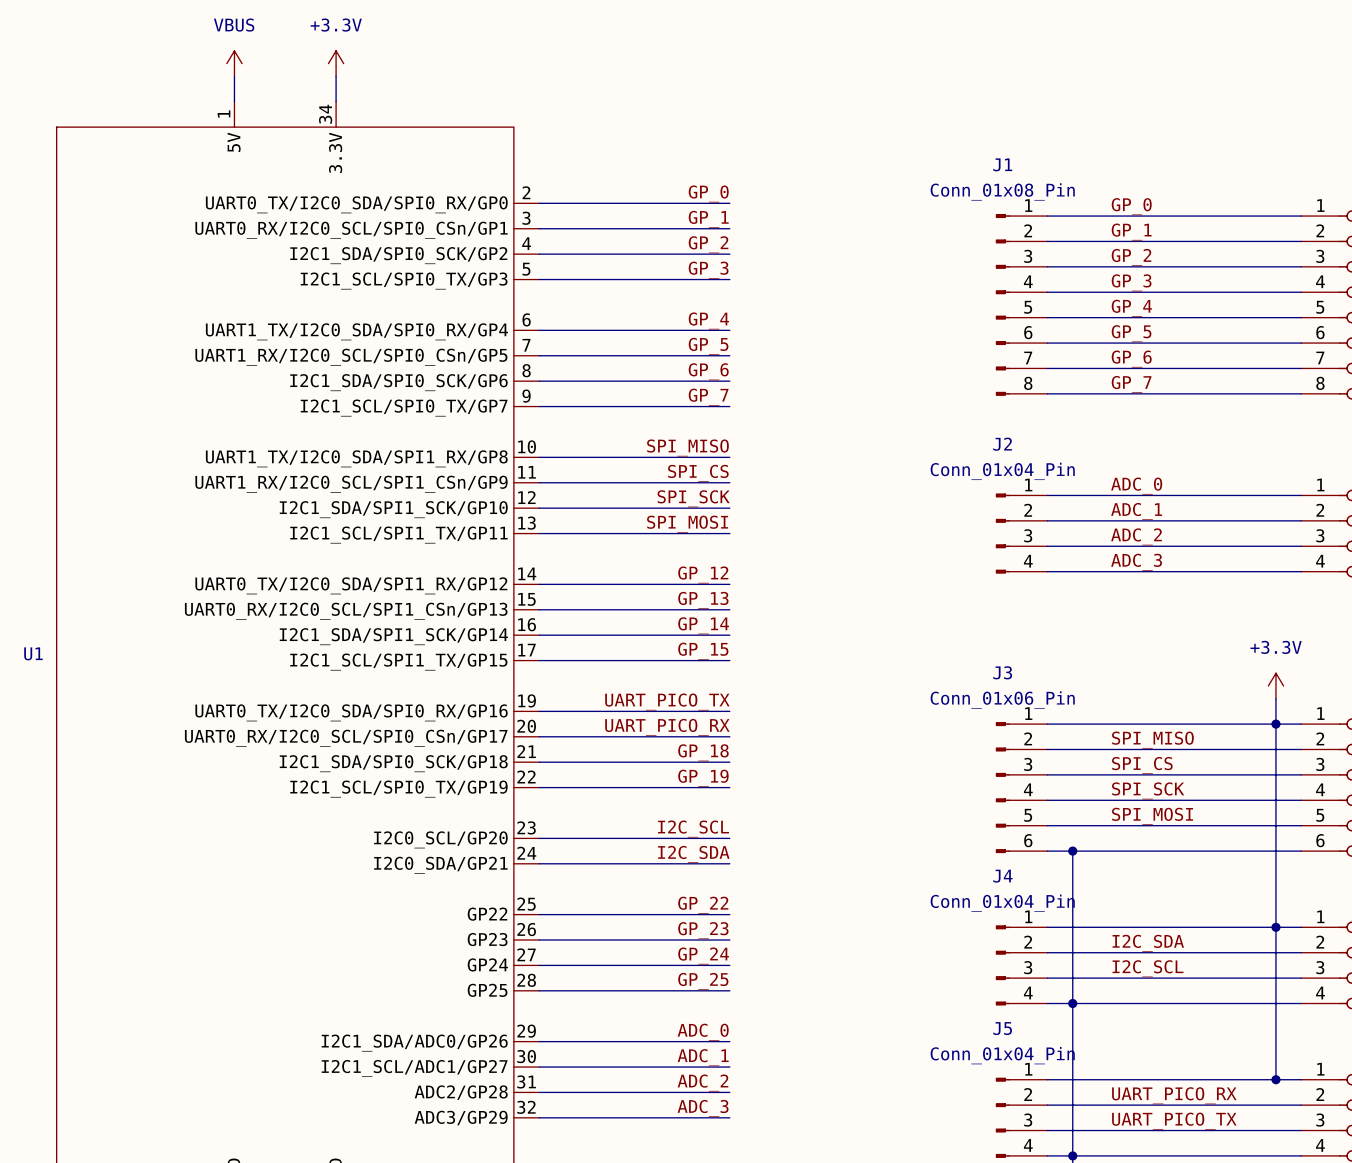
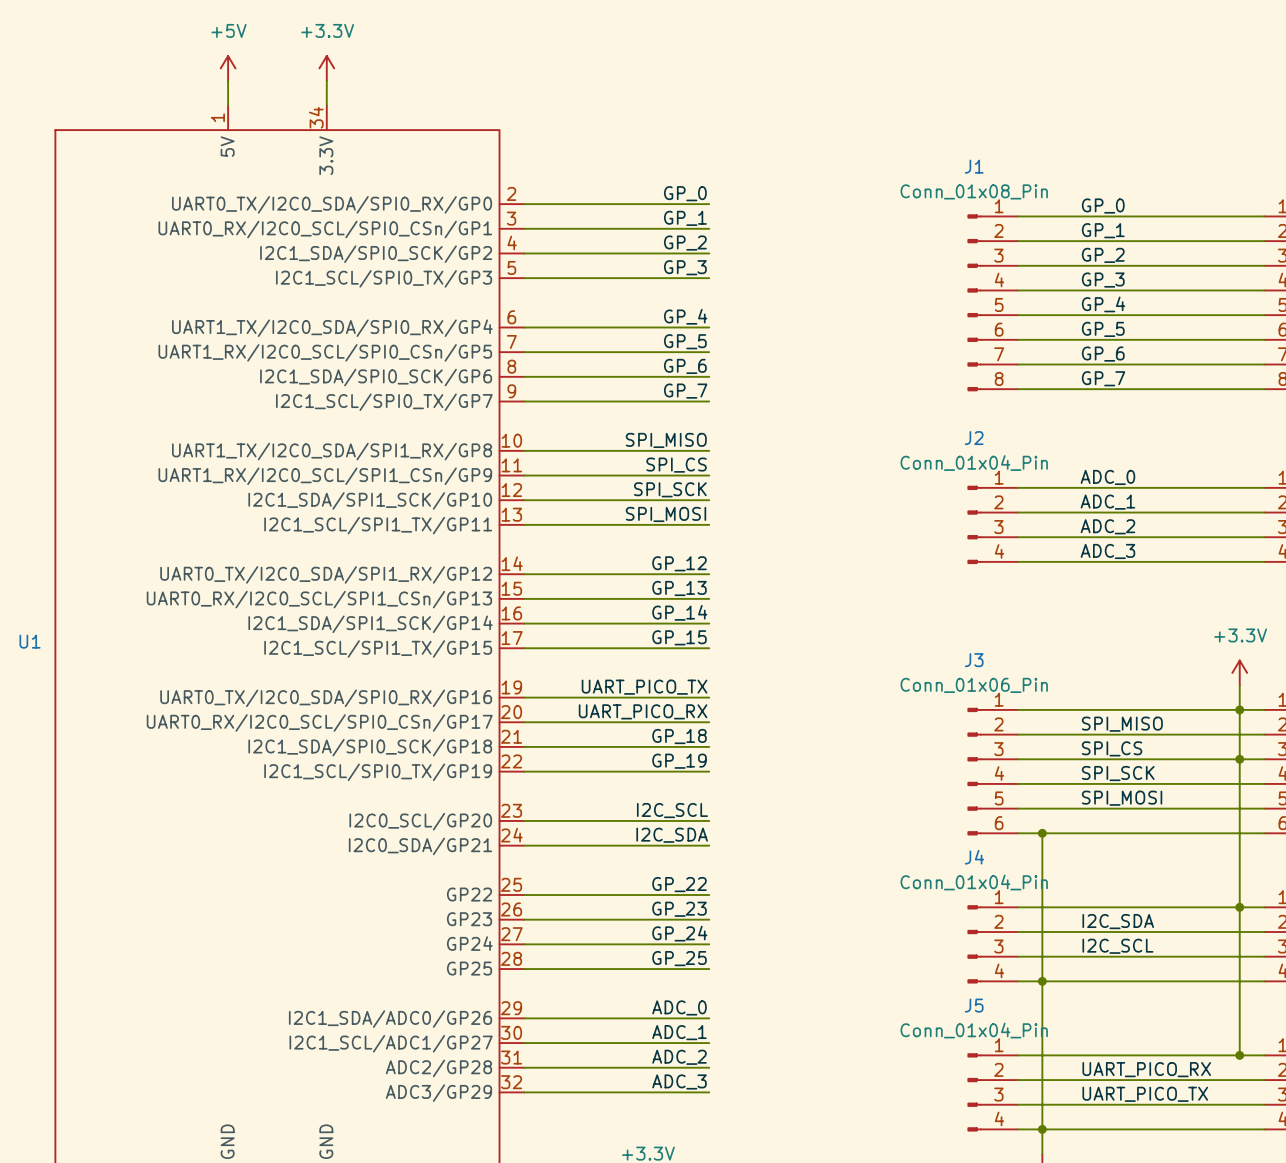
power symbol: VBUS (234, 63) -> +5V (228, 68)
junction: none -> (1239, 759)

